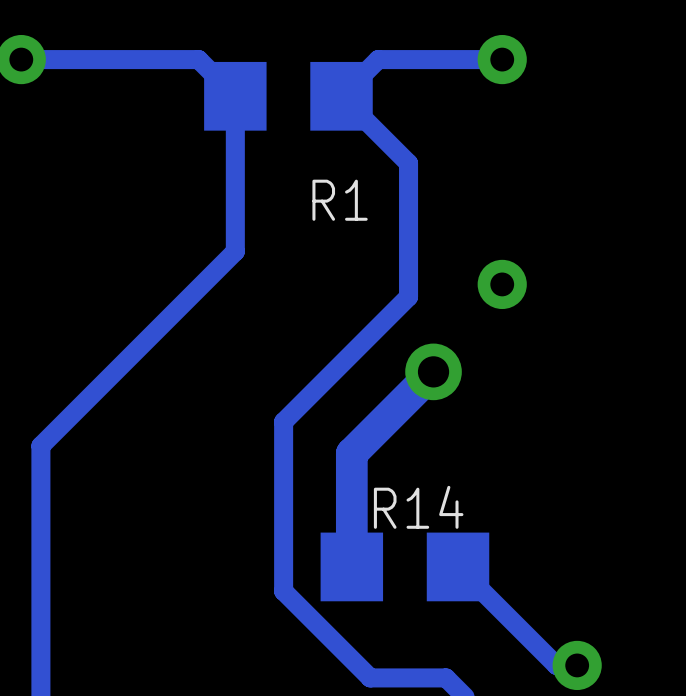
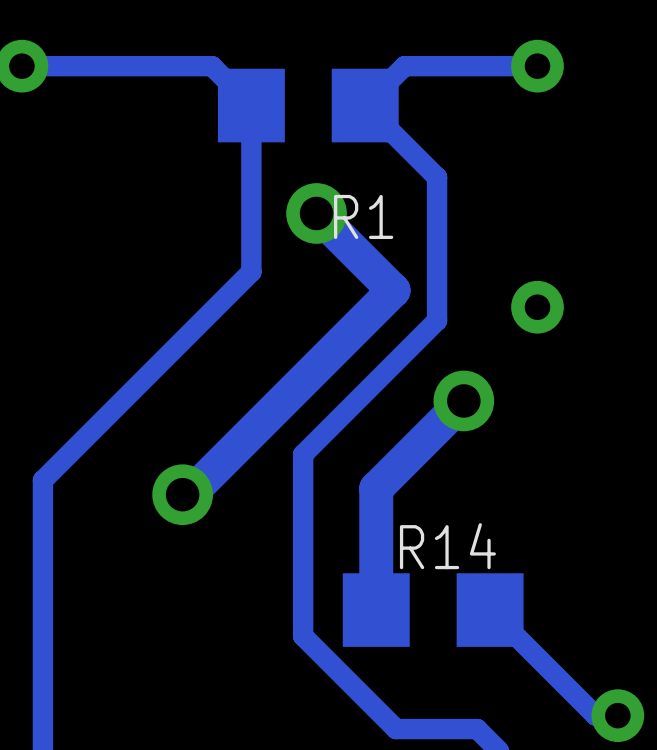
track: none -> (316, 213) (393, 290) (189, 494) (182, 494)
via: none -> (316, 213)
via: none -> (182, 494)

